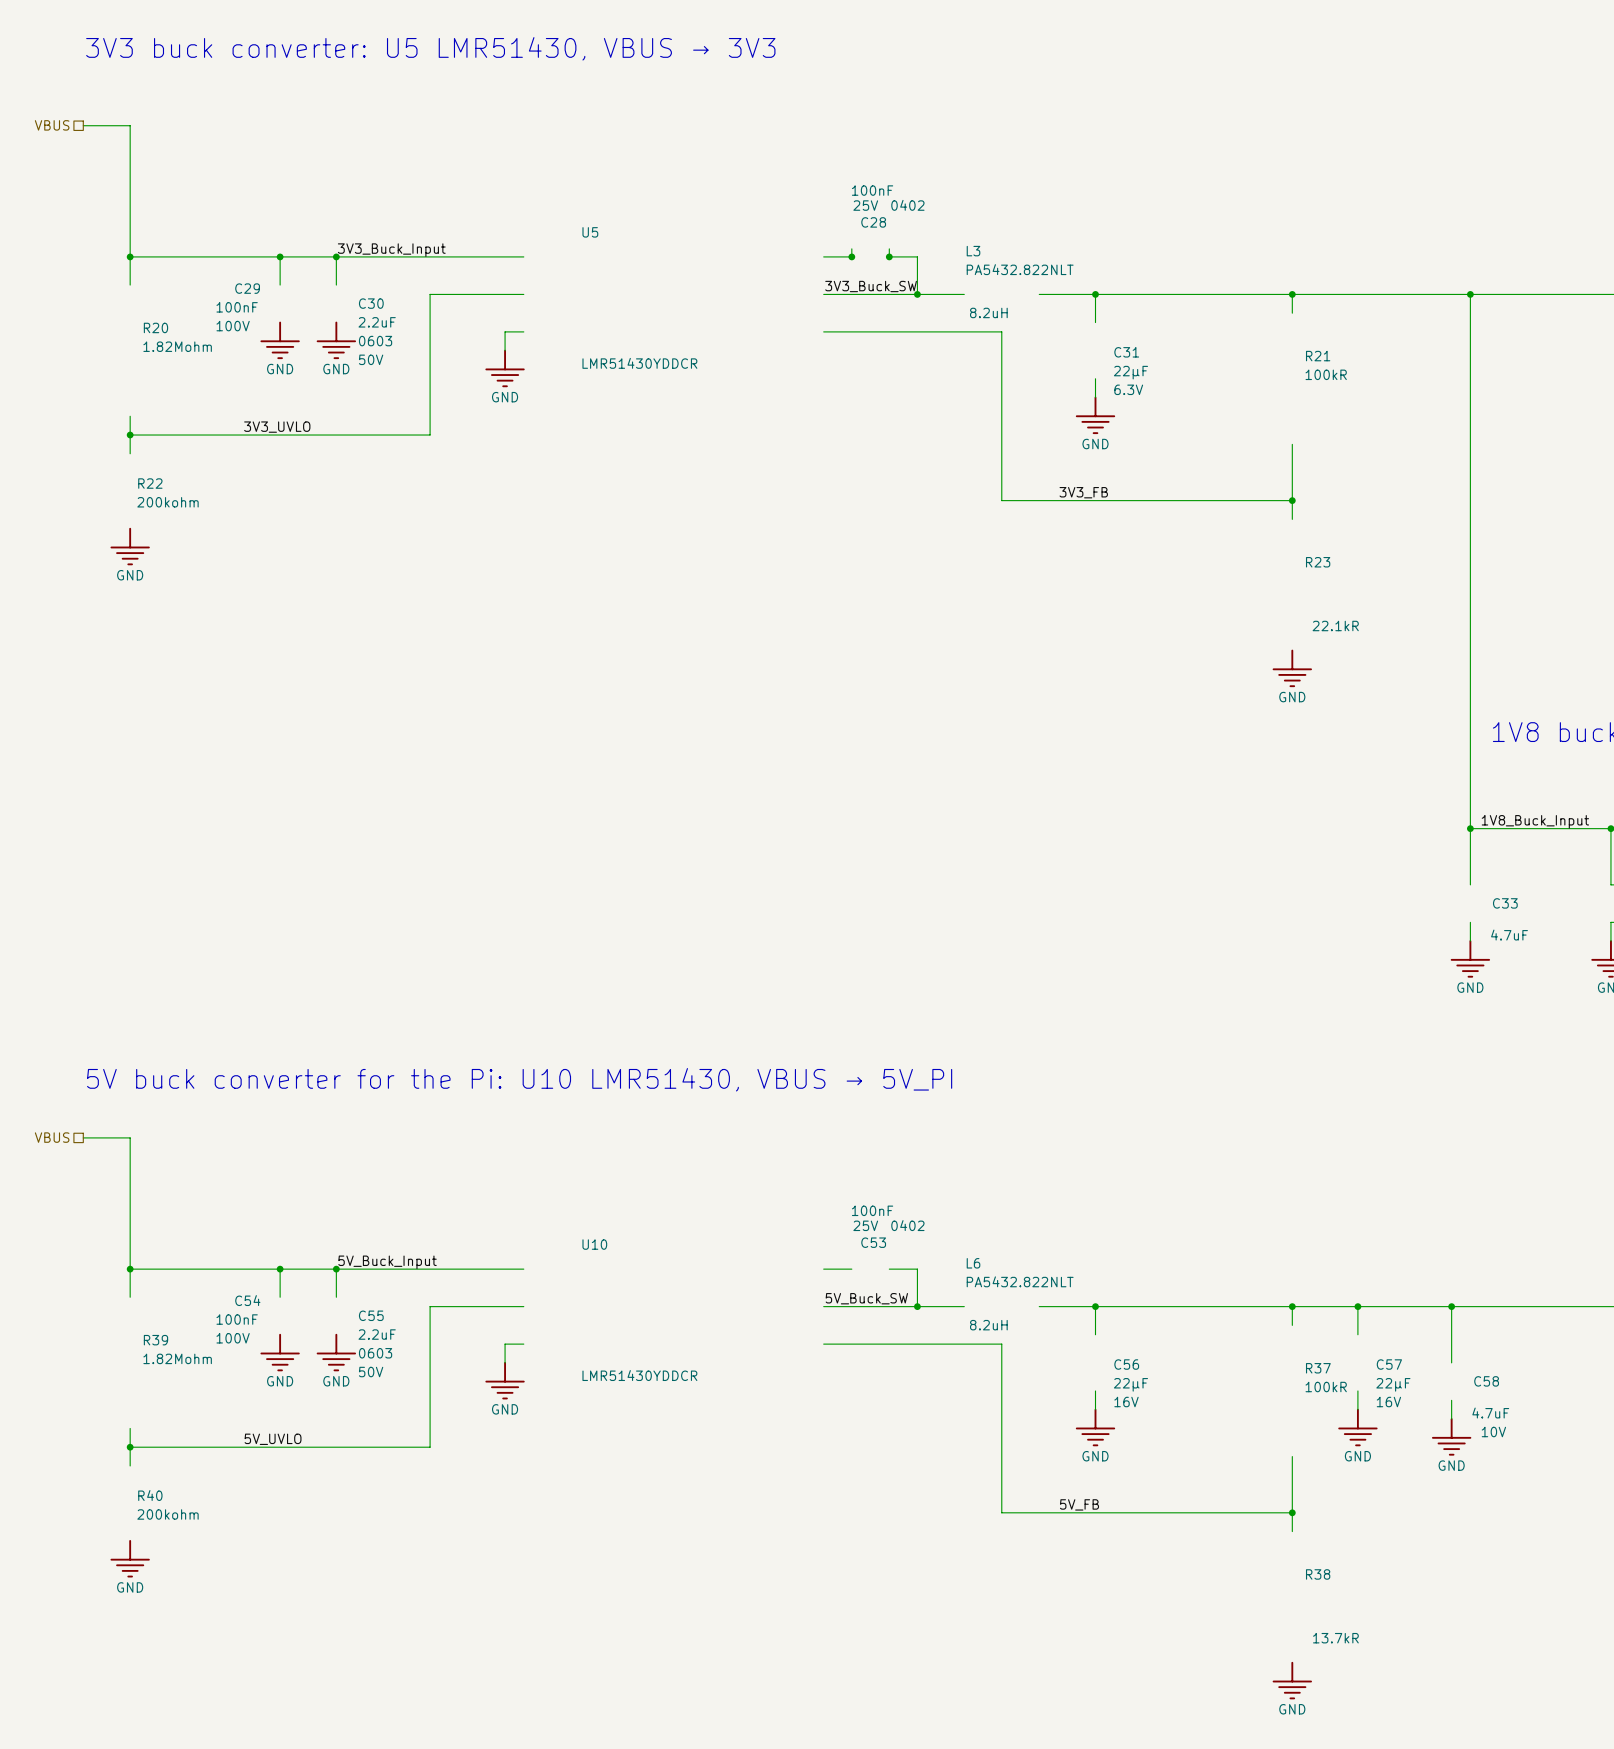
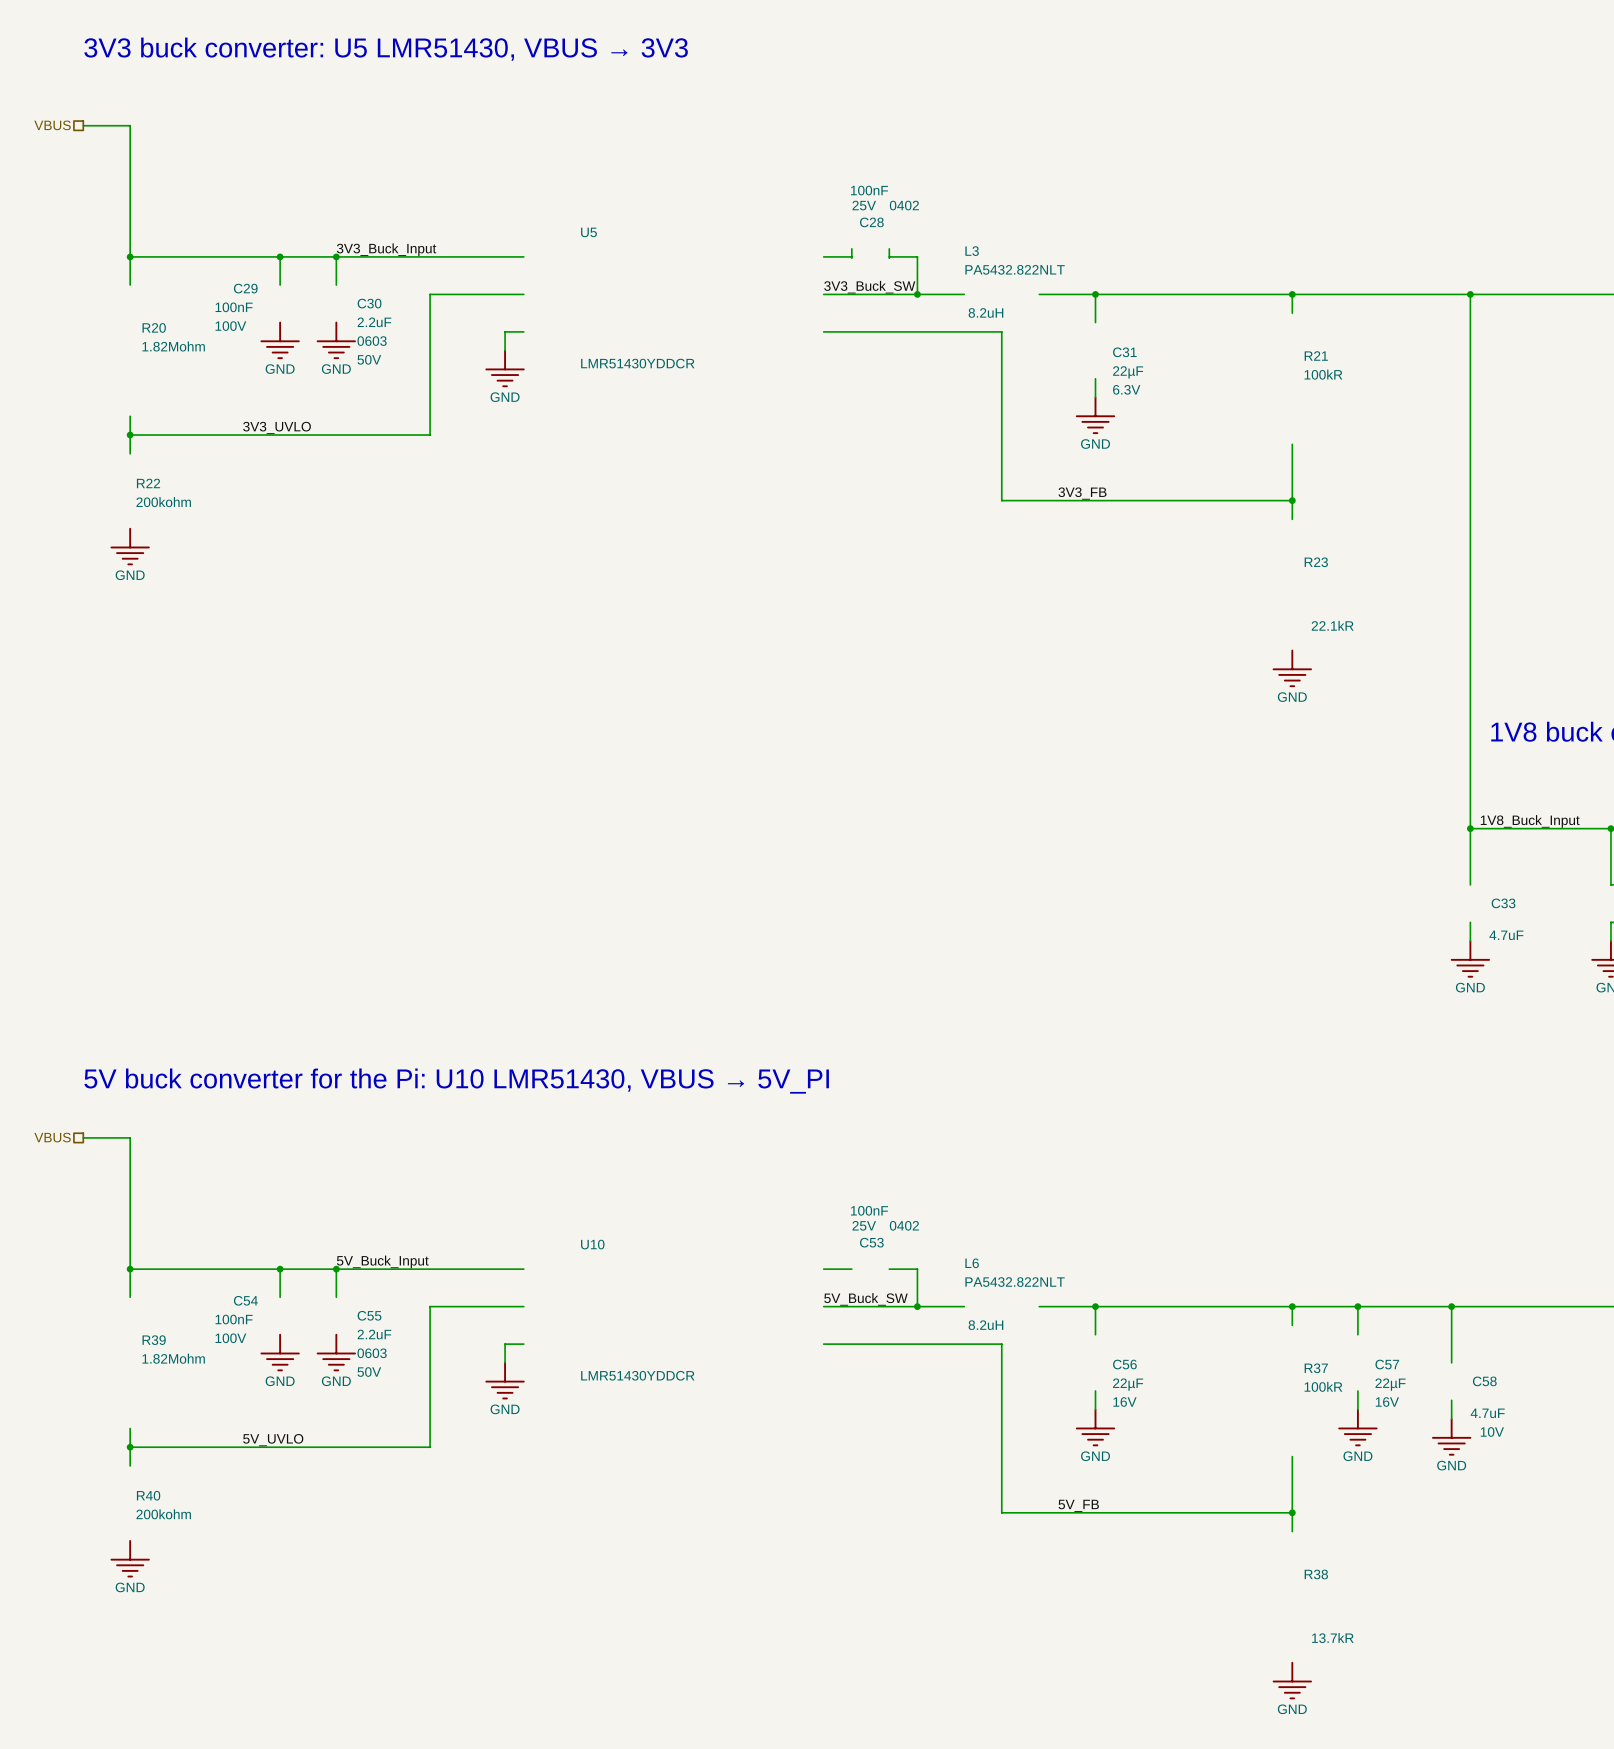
junction: (851, 256) -> none
junction: (889, 256) -> none

